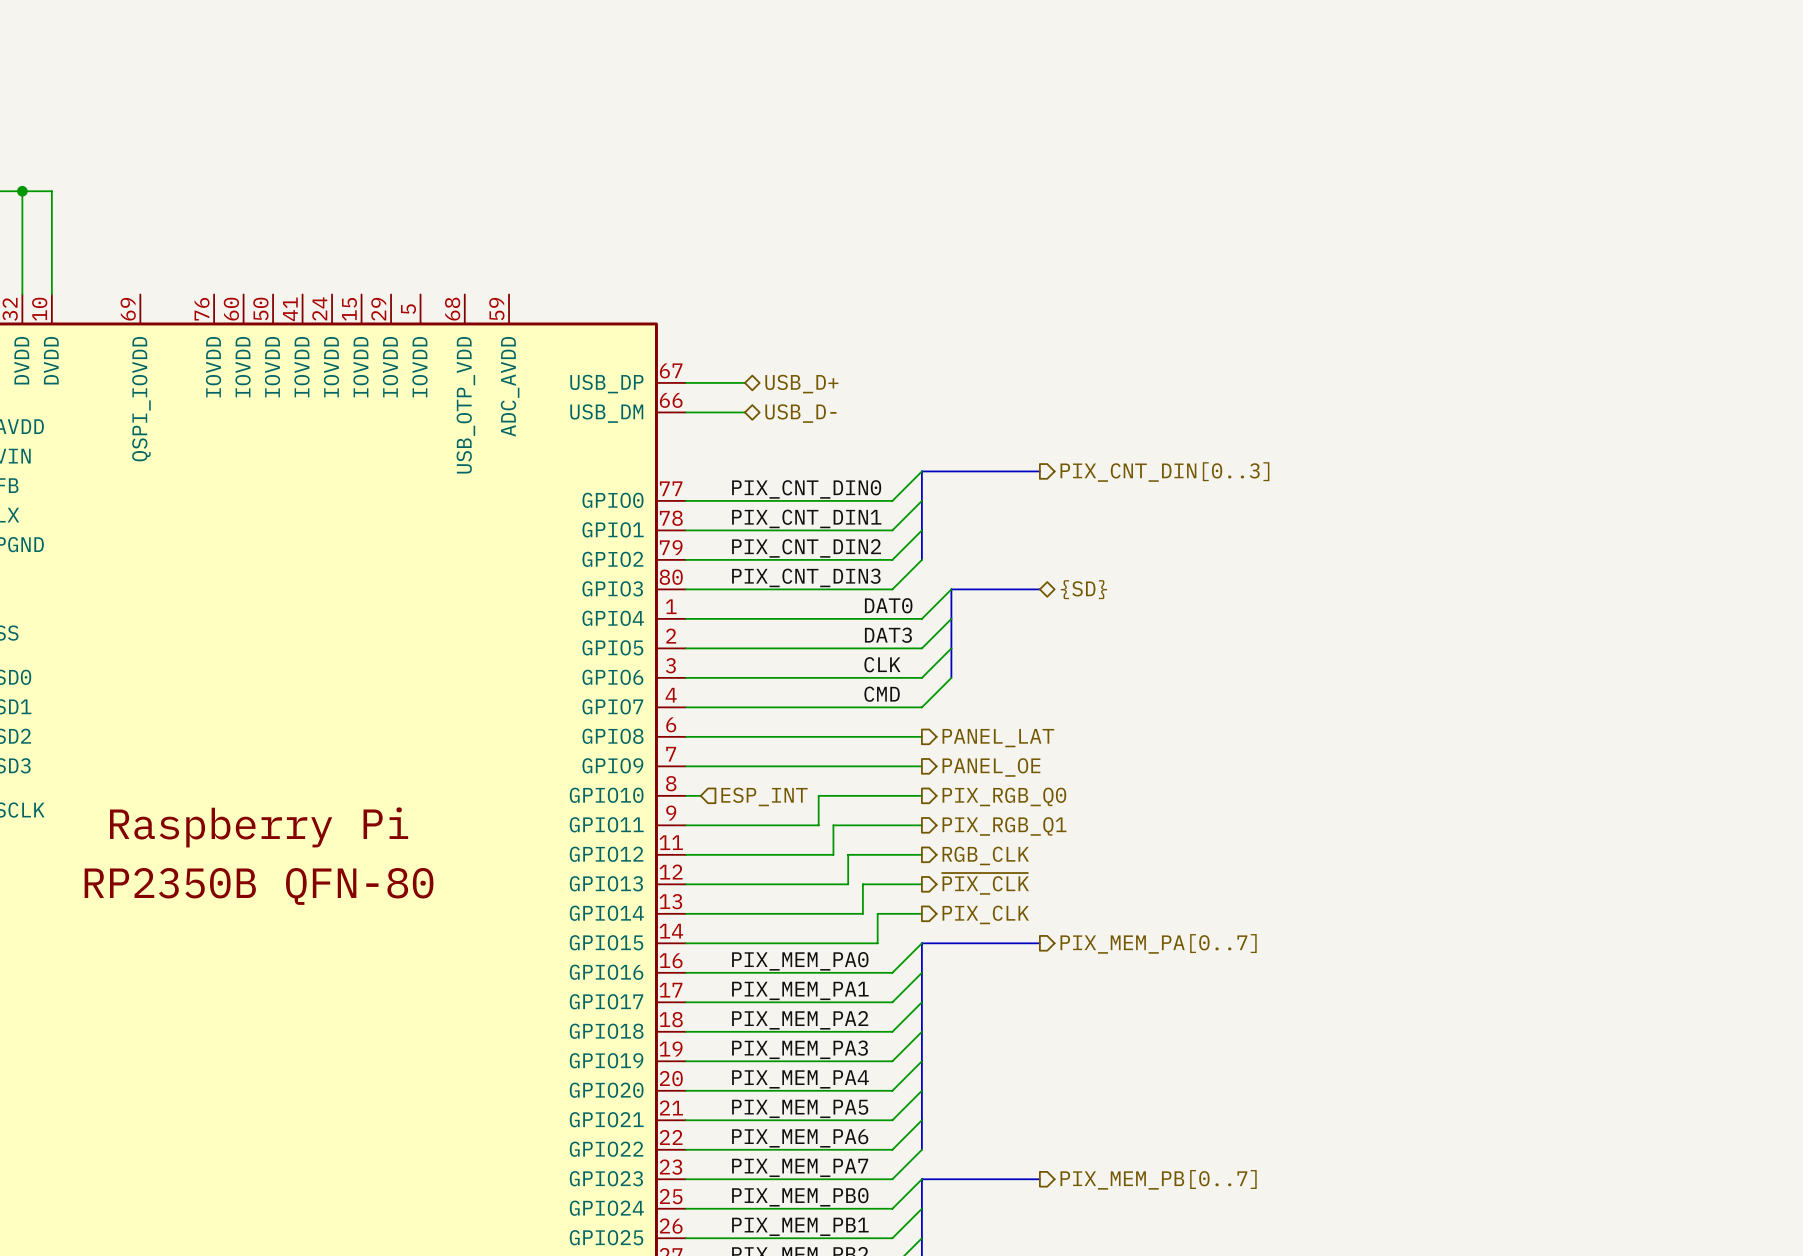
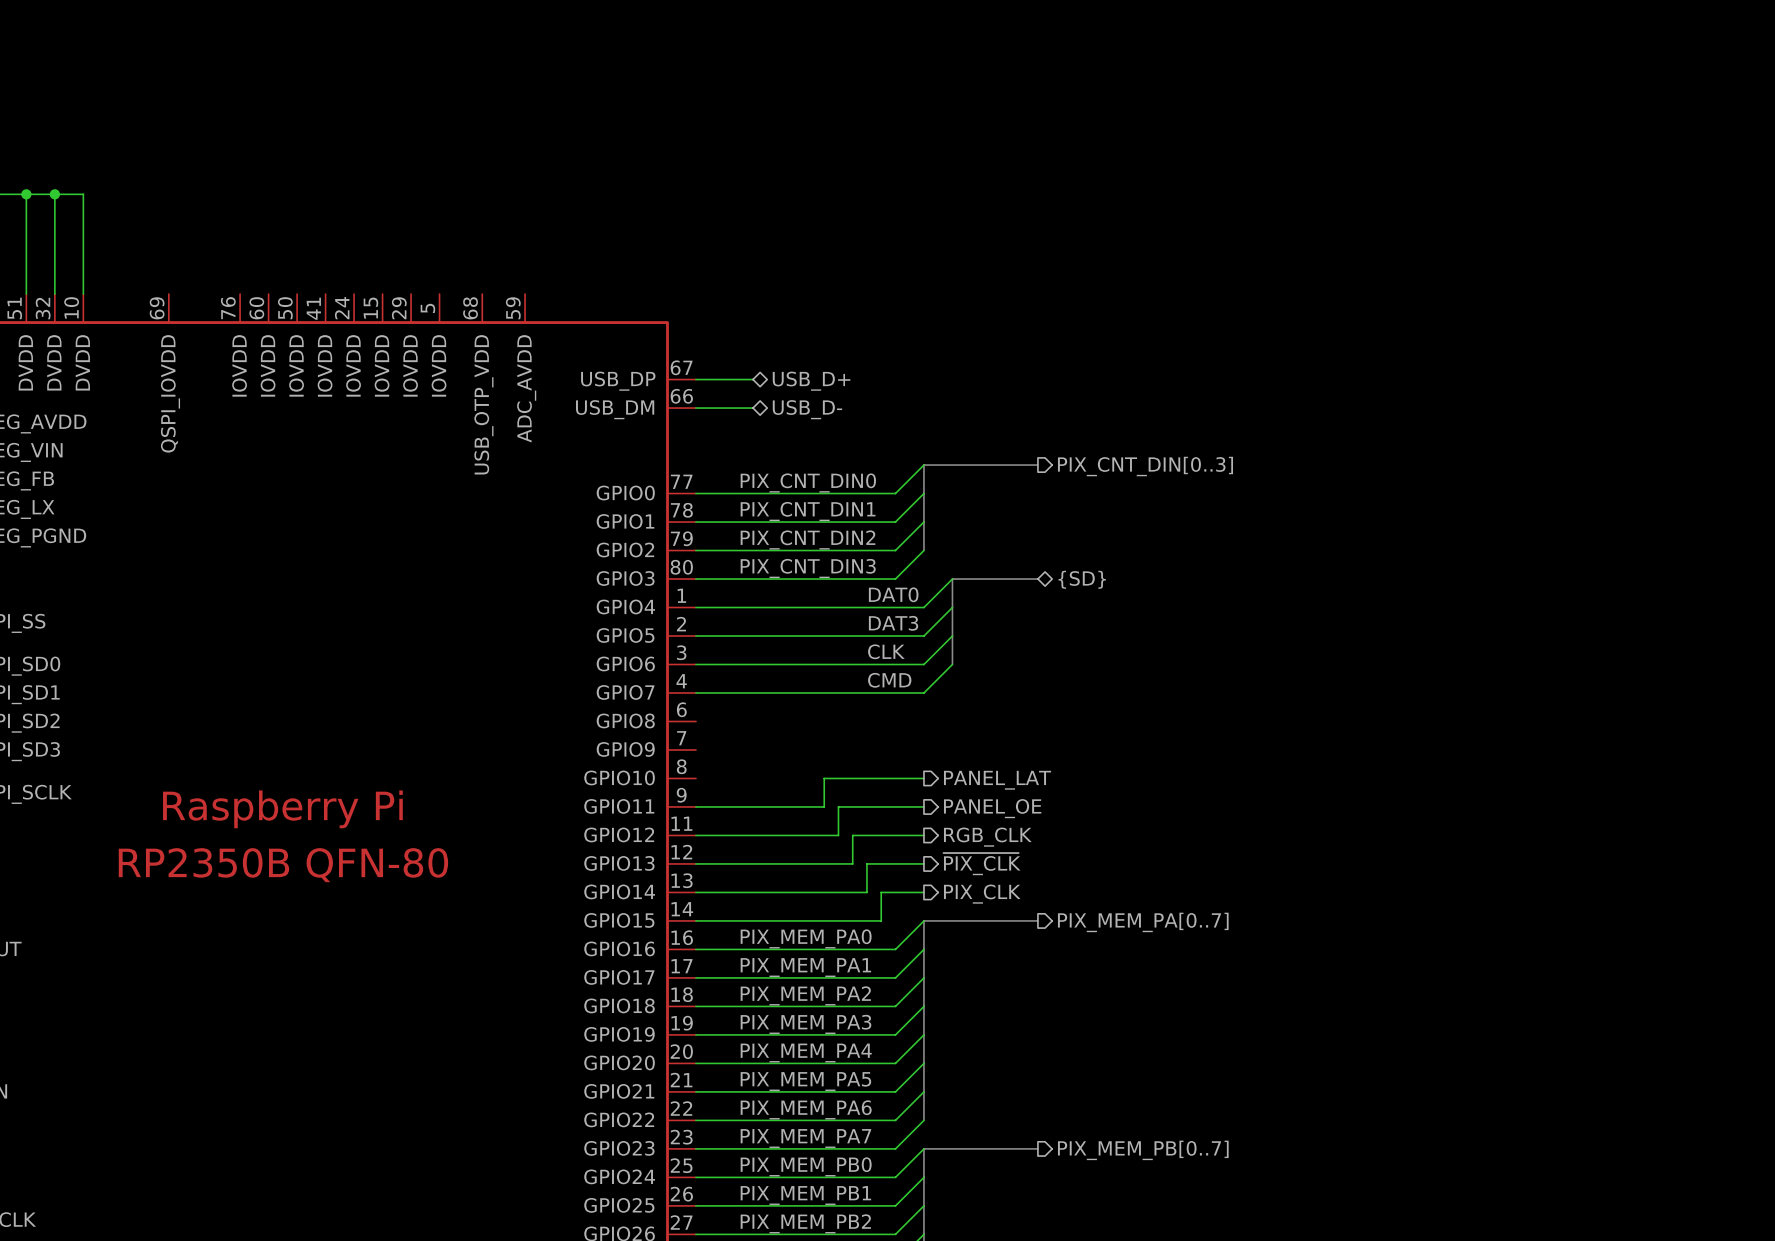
wire: (685, 736) (921, 736) -> none
hierarchical label: PANEL_LAT (998, 738) -> none
wire: (685, 766) (921, 766) -> none
hierarchical label: PANEL_OE (991, 767) -> none
wire: (685, 795) (700, 795) -> none
hierarchical label: ESP_INT (764, 796) -> none
hierarchical label: PIX_RGB_Q0 (1004, 796) -> PANEL_LAT (997, 780)
hierarchical label: PIX_RGB_Q1 (1004, 826) -> PANEL_OE (992, 808)

